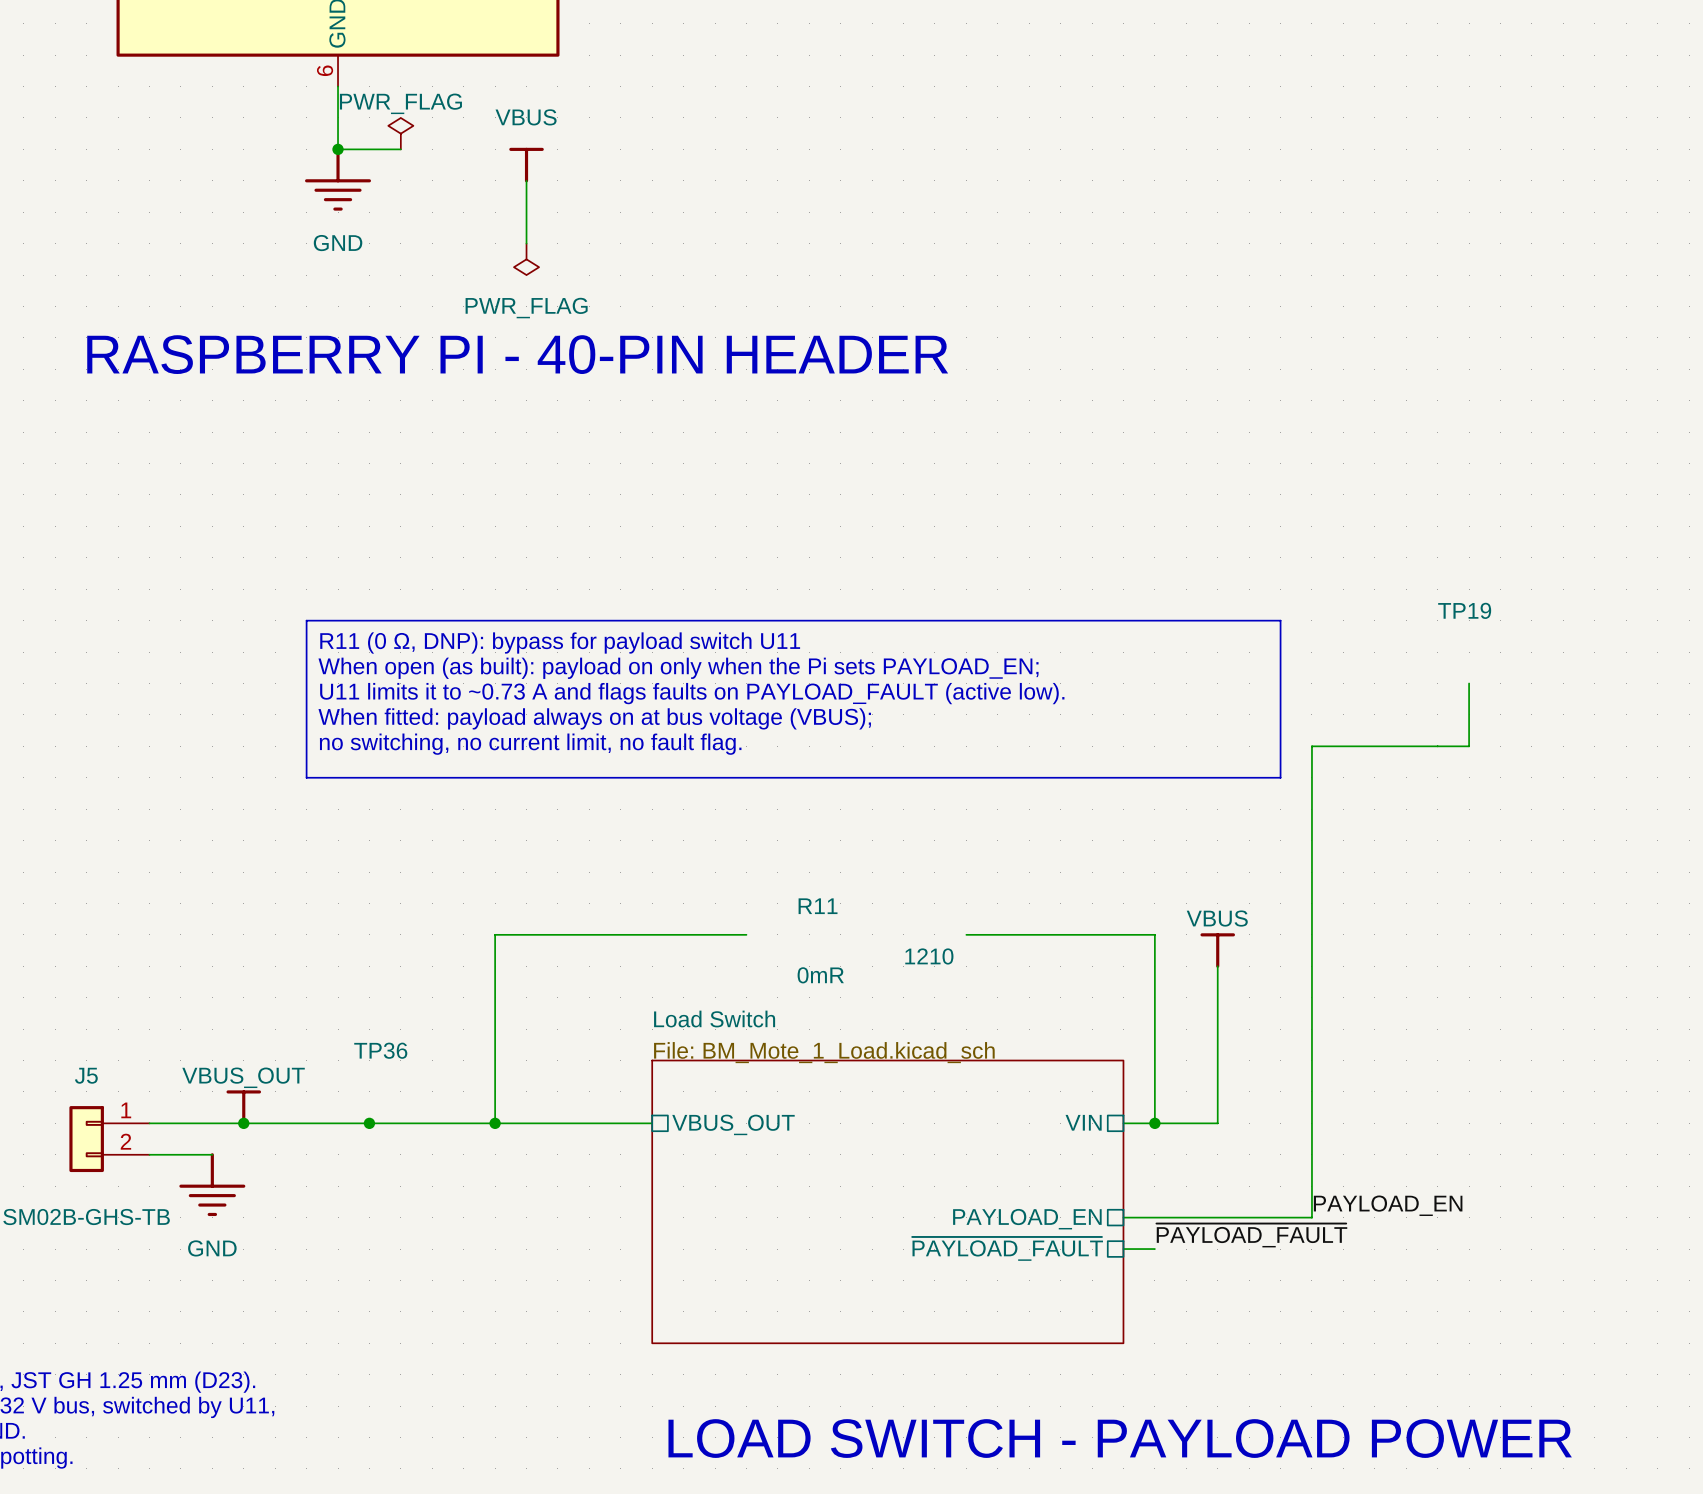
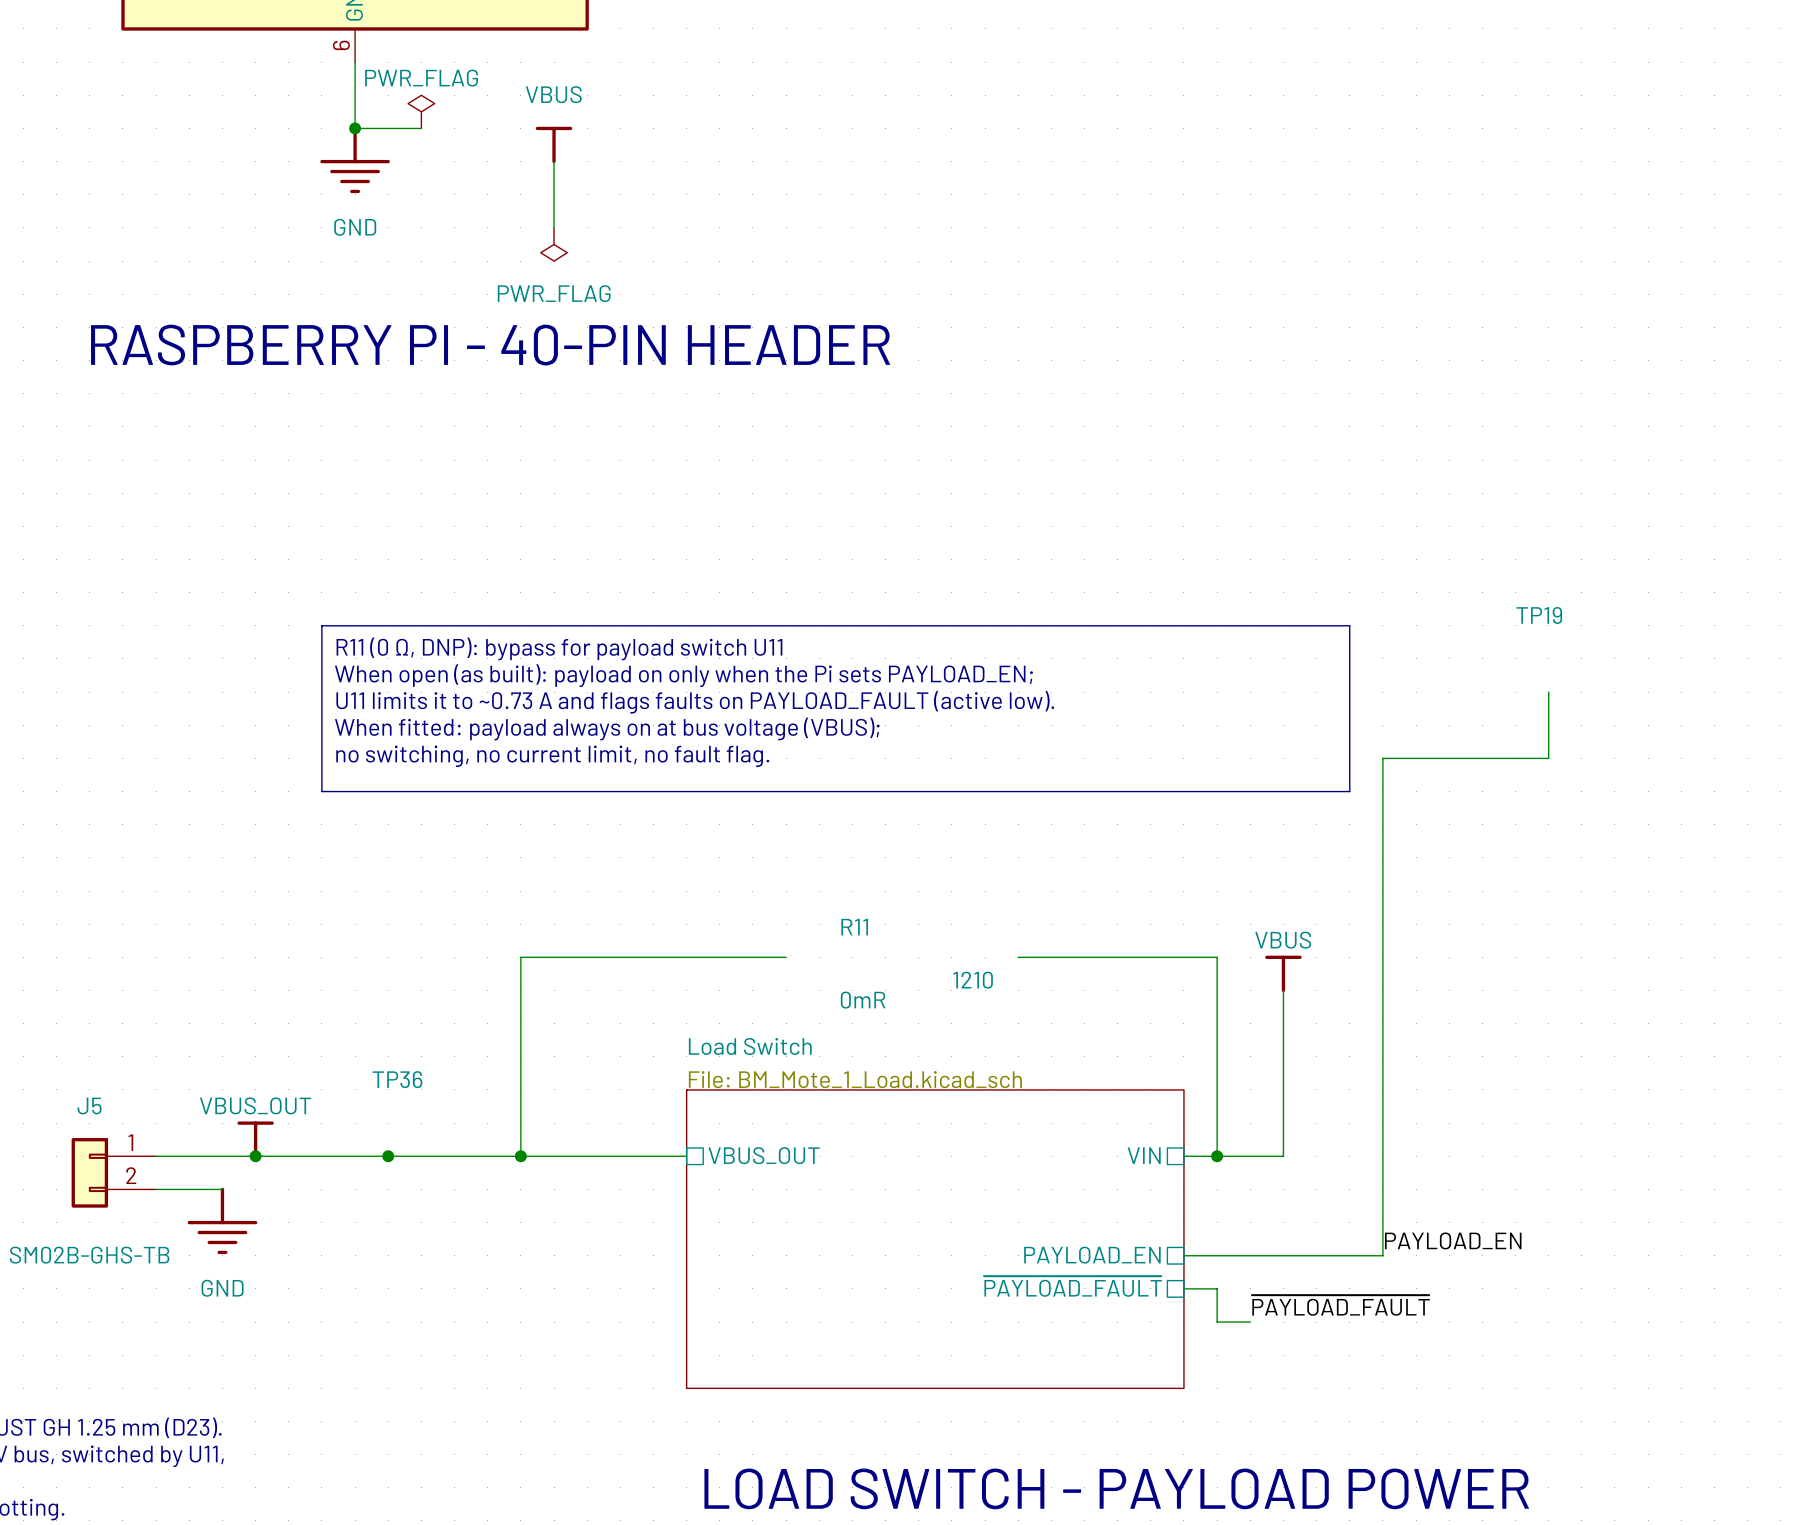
label position: ~{PAYLOAD_FAULT} (1251, 1235) -> ~{PAYLOAD_FAULT} (1340, 1305)
wire: none -> (1217, 1288) (1217, 1322) (1250, 1322)

